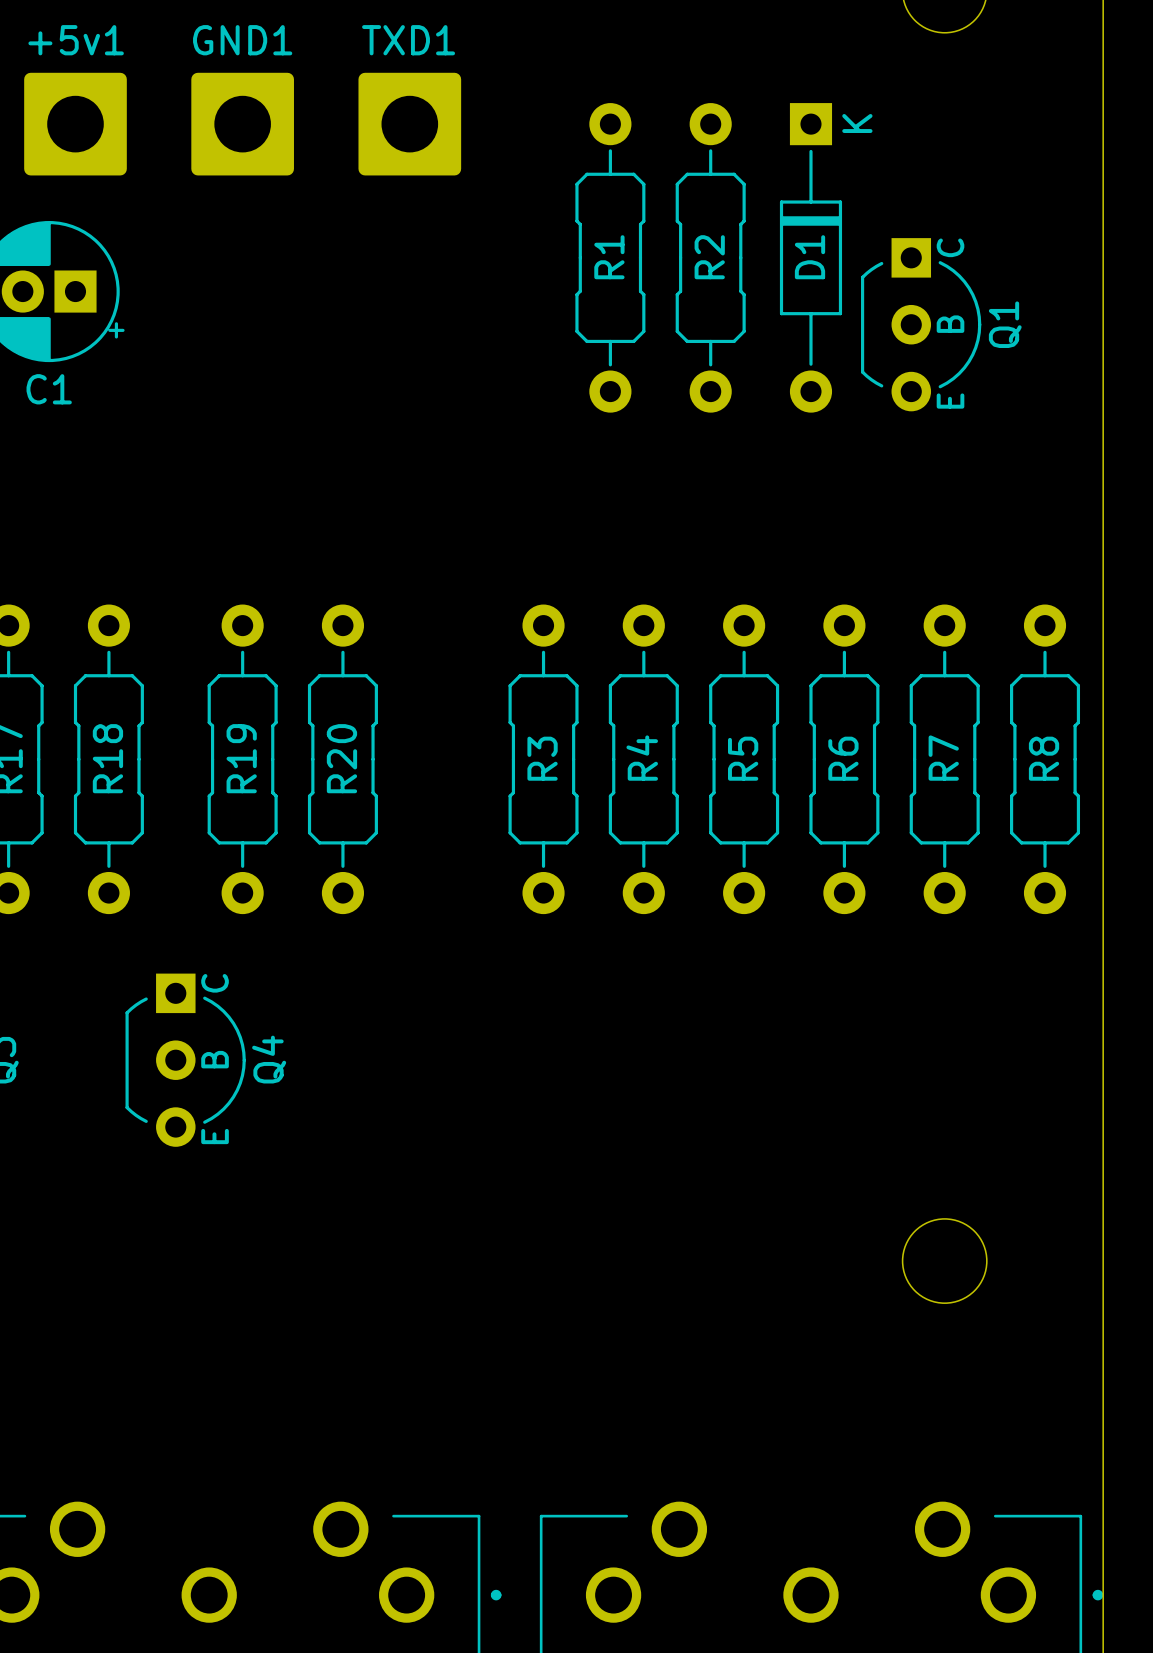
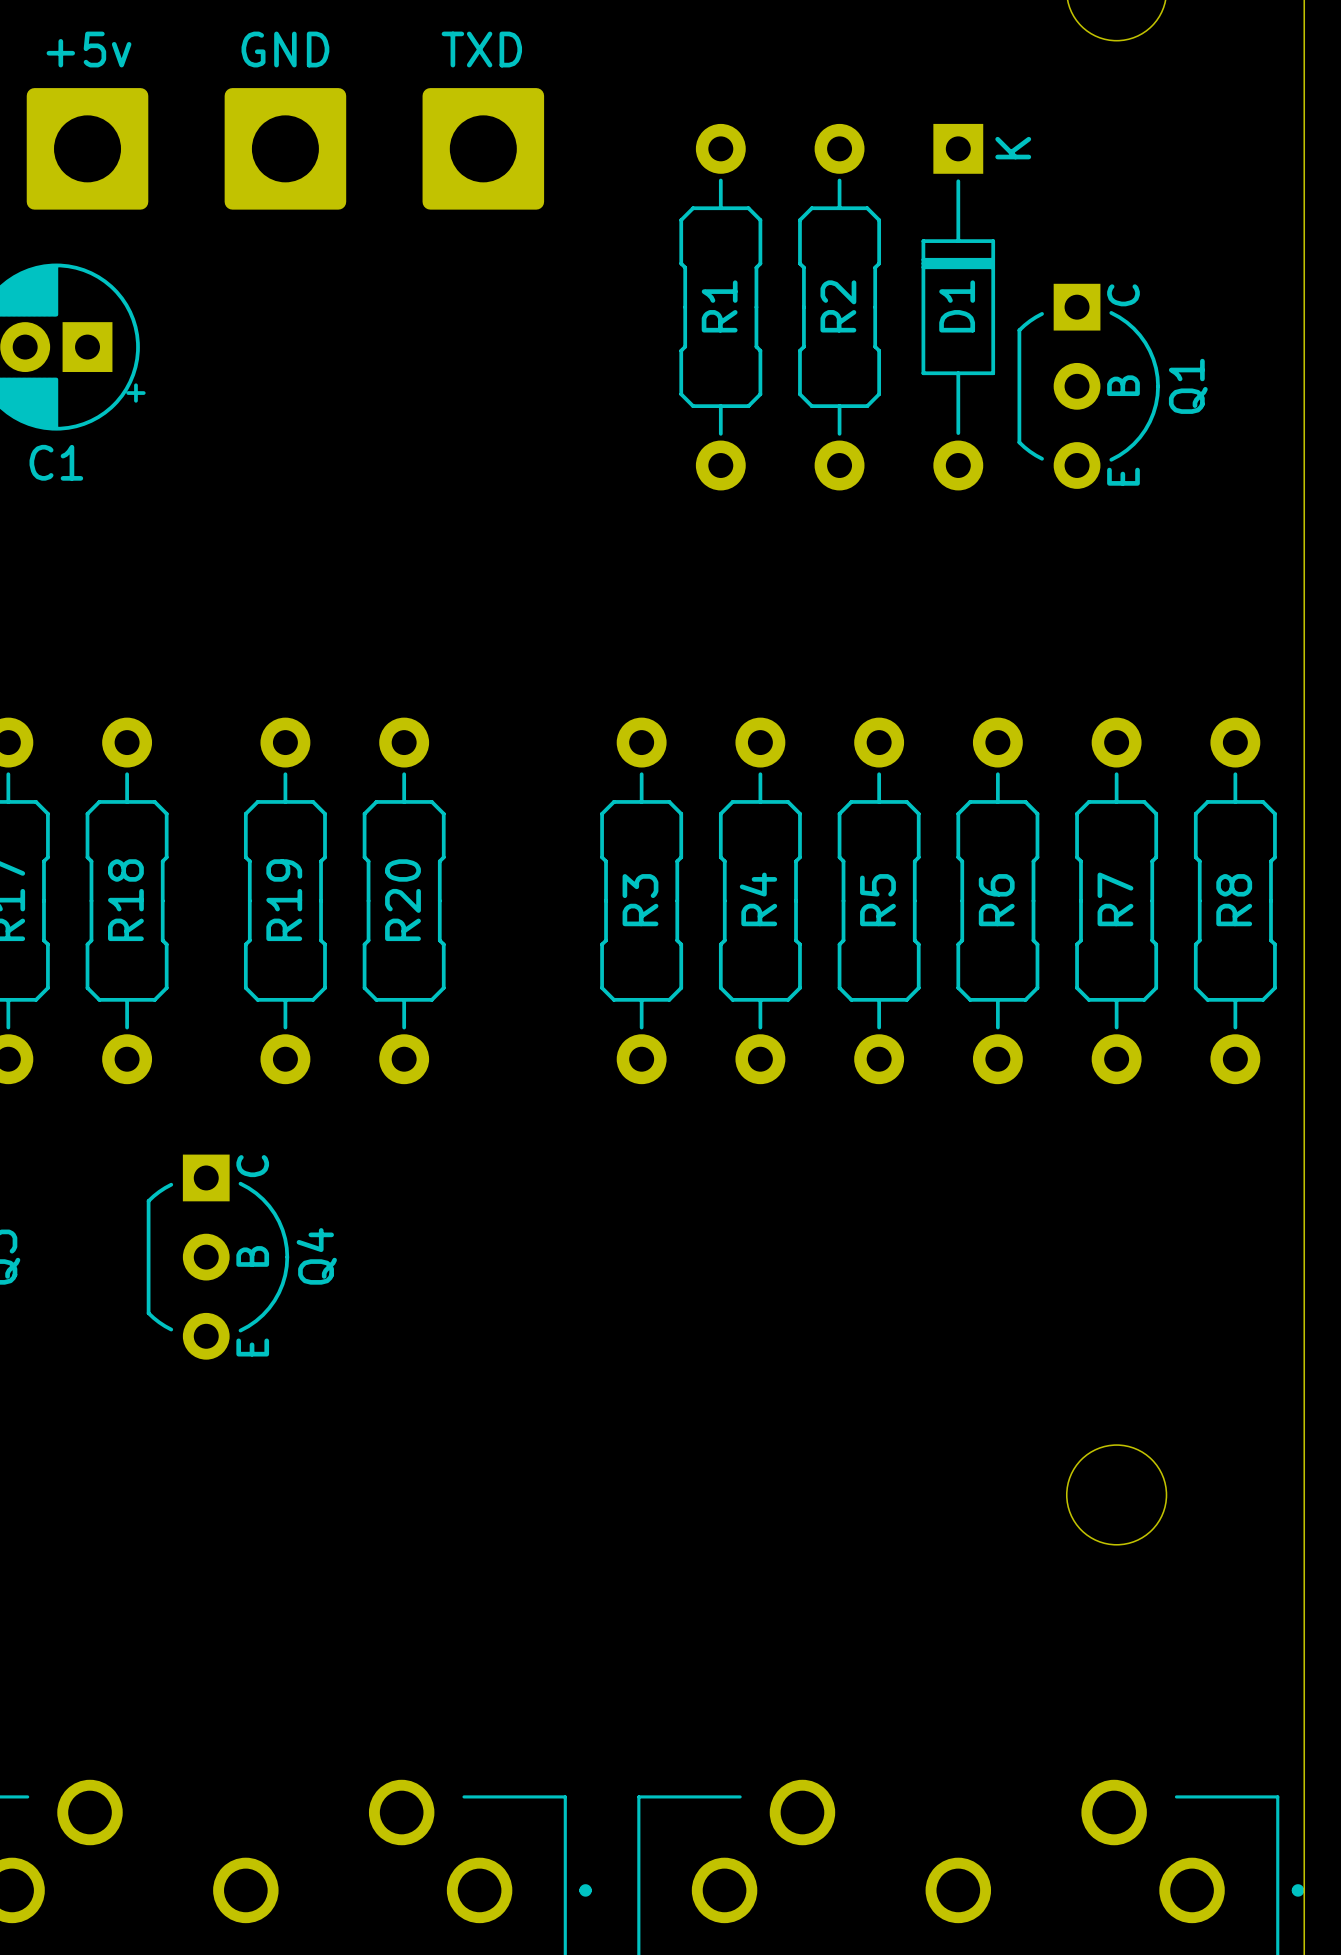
+5v1 name: +5v1 (76, 40) -> +5v (89, 49)
GND1 name: GND1 (242, 40) -> GND (285, 49)
TXD1 name: TXD1 (408, 40) -> TXD (481, 49)

